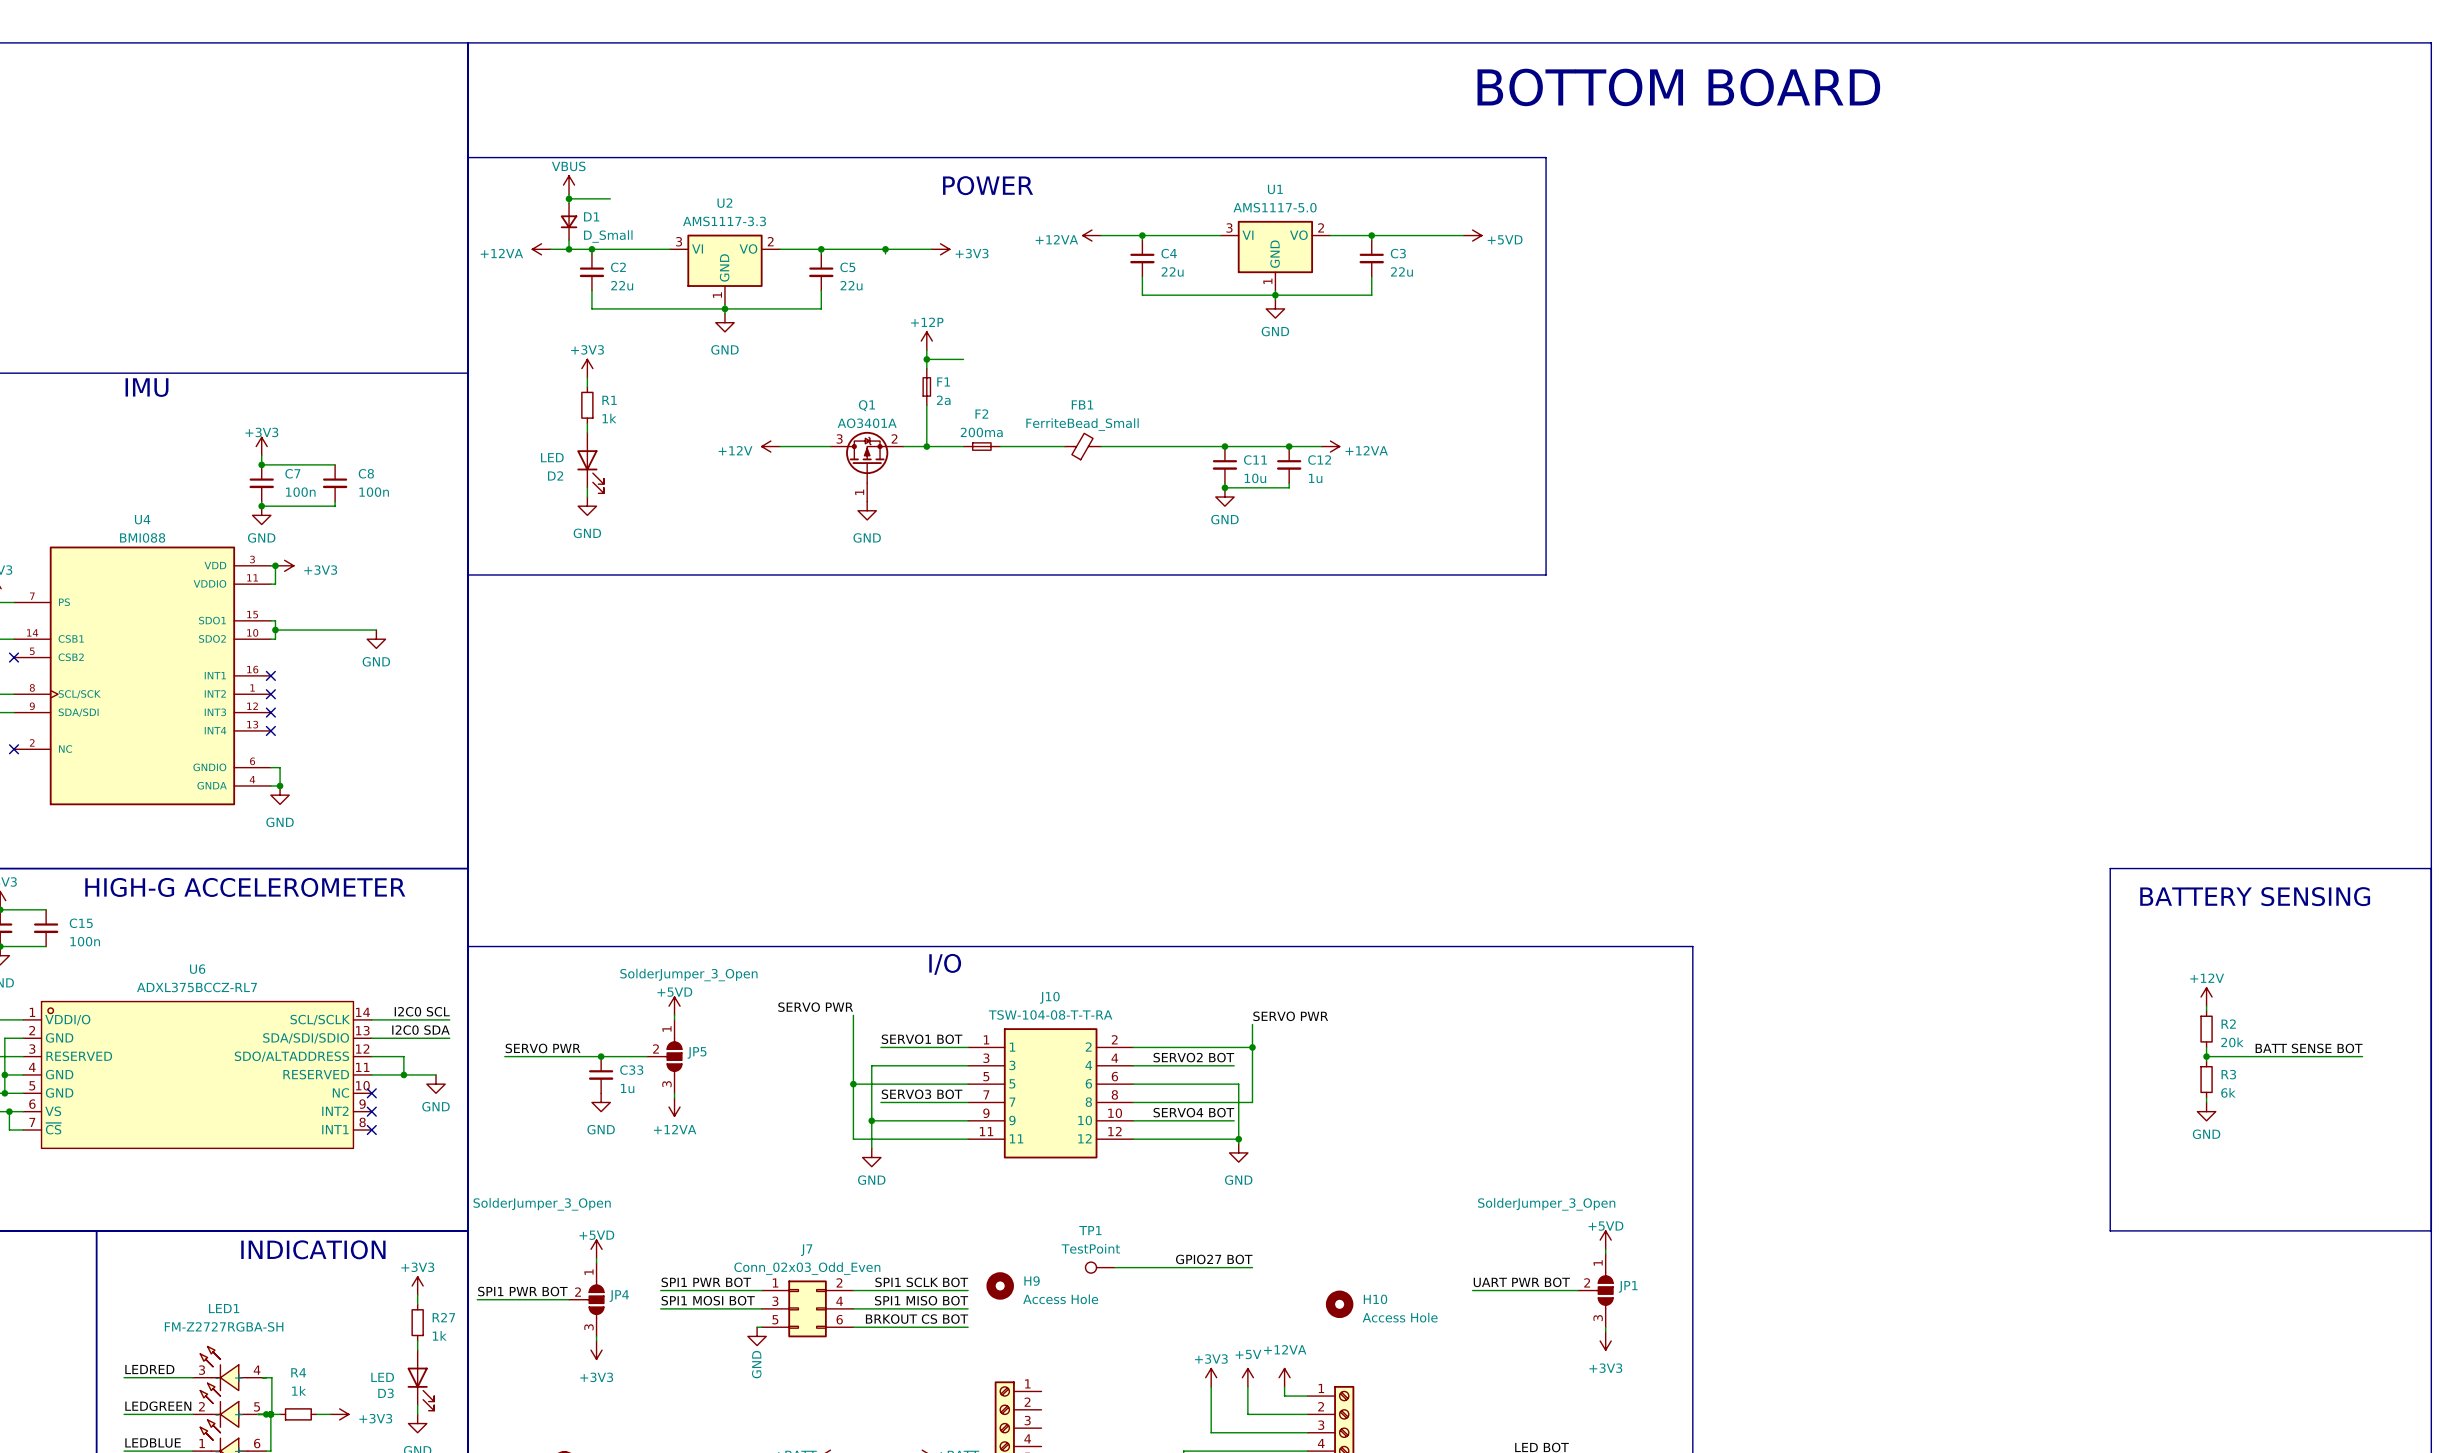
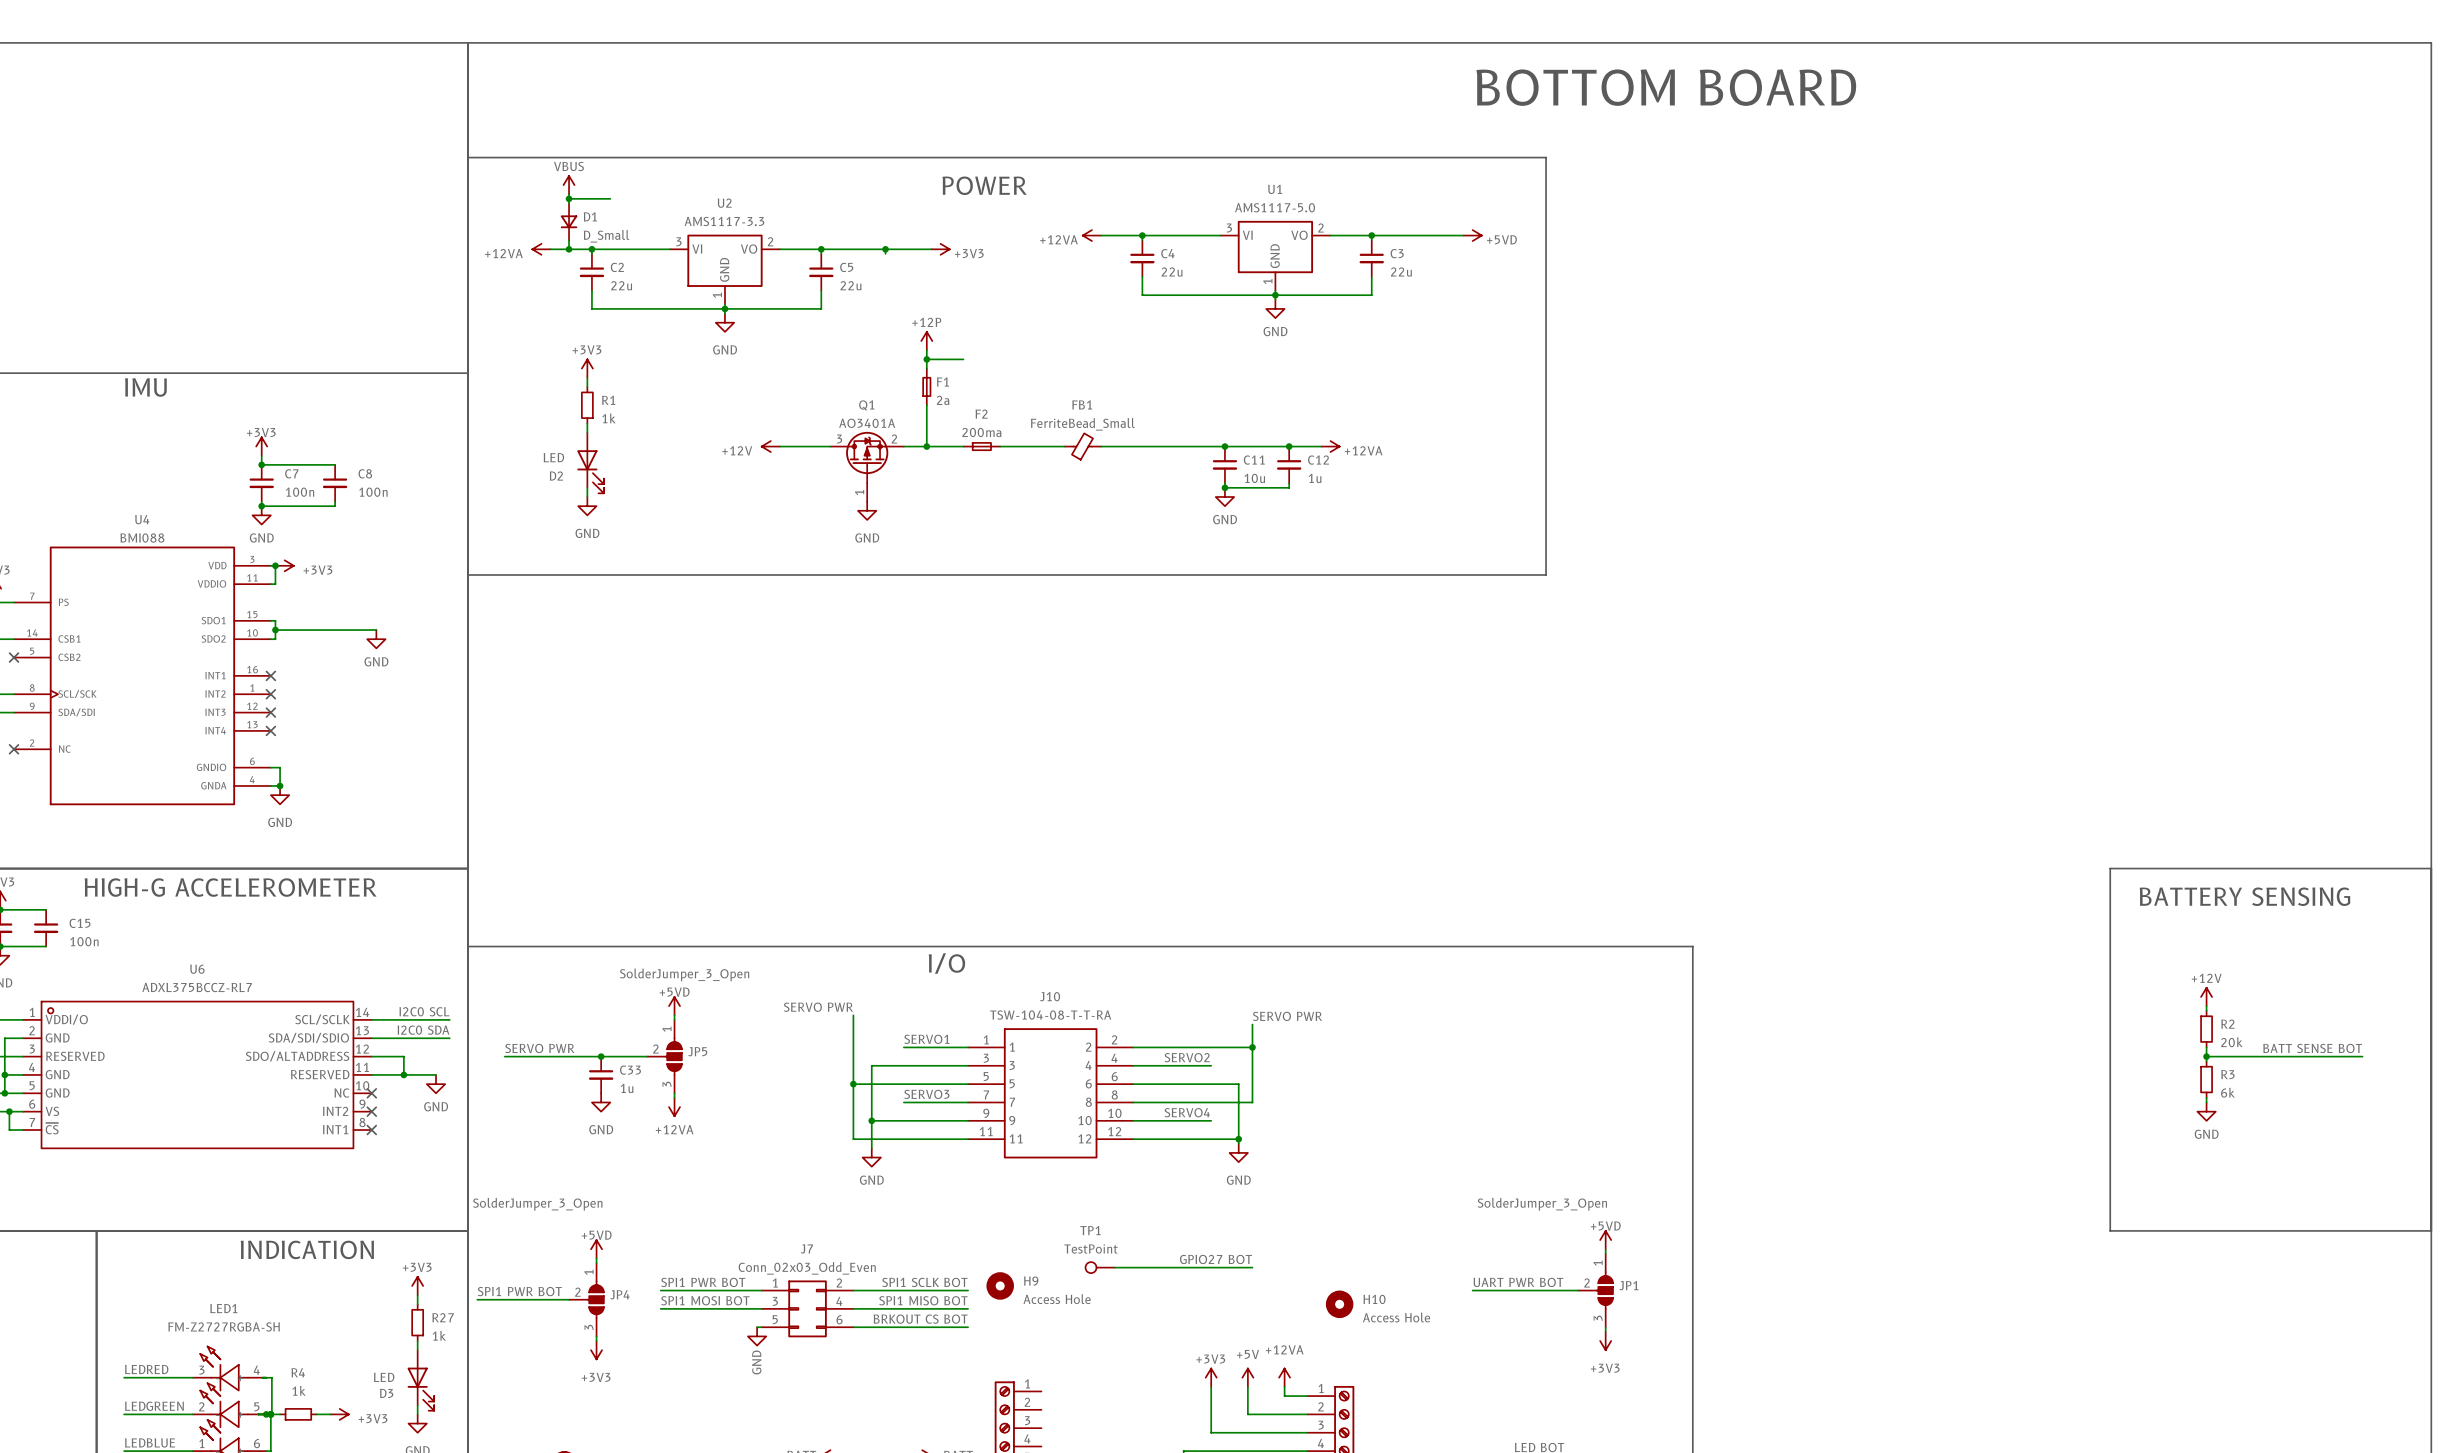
label: SERVO1 BOT (922, 1039) -> SERVO1 (926, 1039)
wire: (880, 1047) (903, 1047) -> none
label: SERVO2 BOT (1193, 1057) -> SERVO2 (1187, 1057)
wire: (1211, 1065) (1234, 1065) -> none
label: SERVO3 BOT (922, 1094) -> SERVO3 (926, 1094)
wire: (880, 1102) (903, 1102) -> none
label: SERVO4 BOT (1193, 1112) -> SERVO4 (1187, 1112)
wire: (1211, 1120) (1234, 1120) -> none

